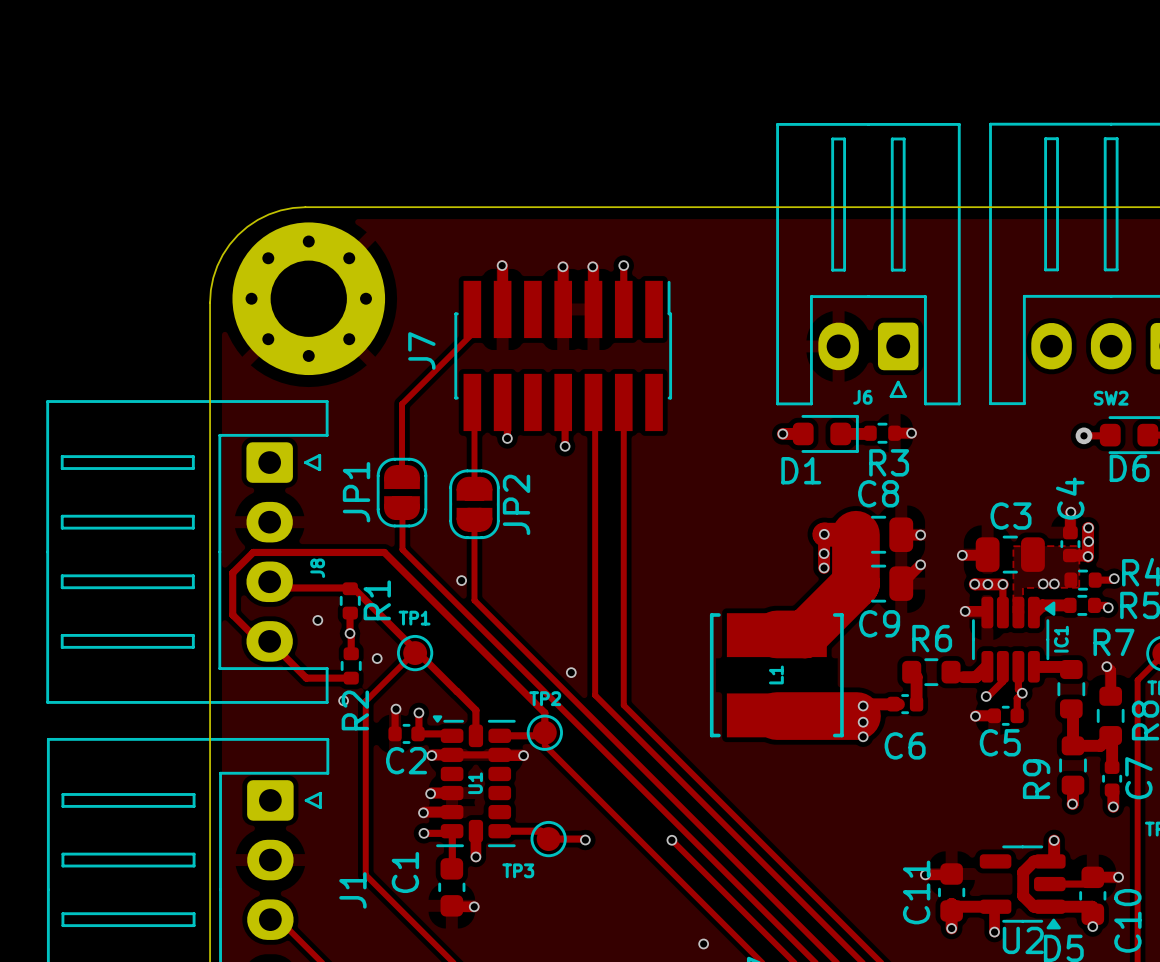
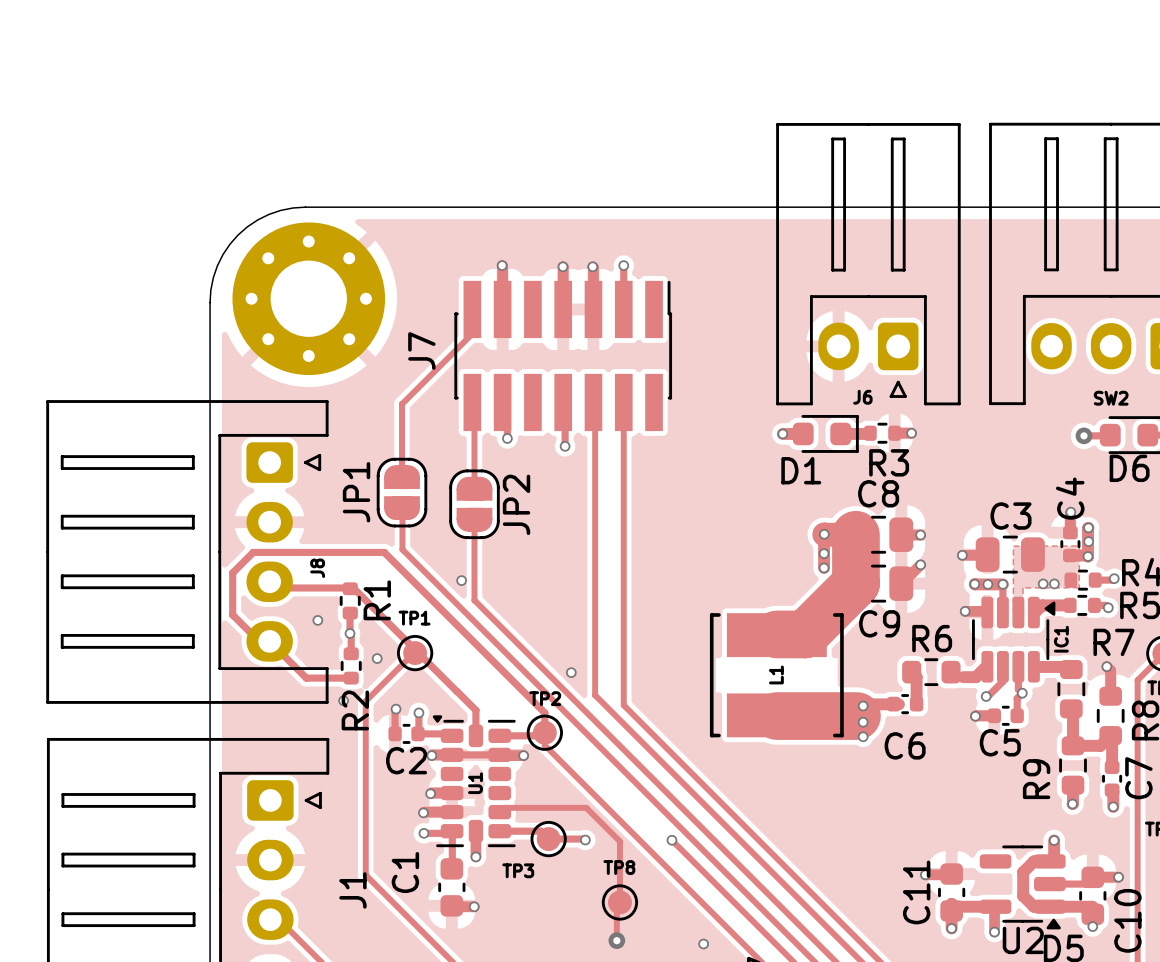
track: none -> (499, 812) (504, 807) (586, 807) (619, 841) (619, 902) (616, 905) (616, 940)
TP8: none -> (619, 902)
via: none -> (616, 940)

